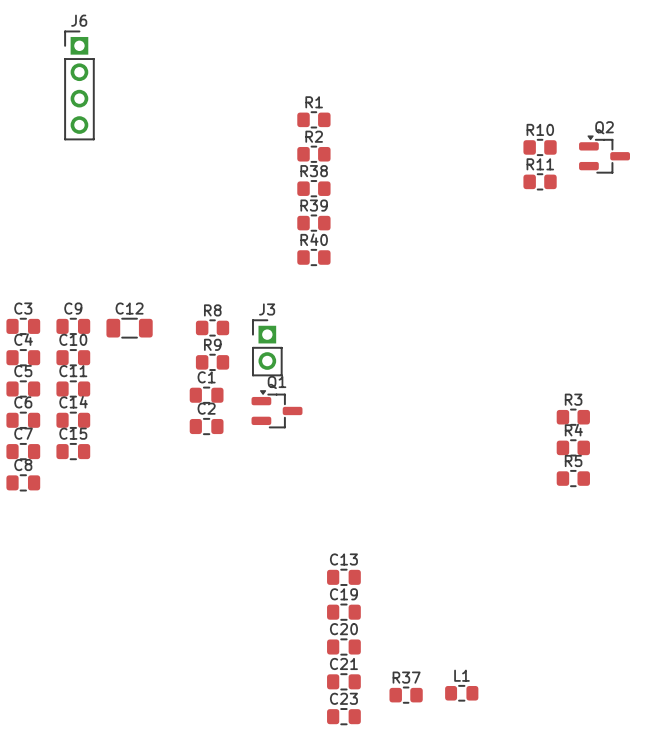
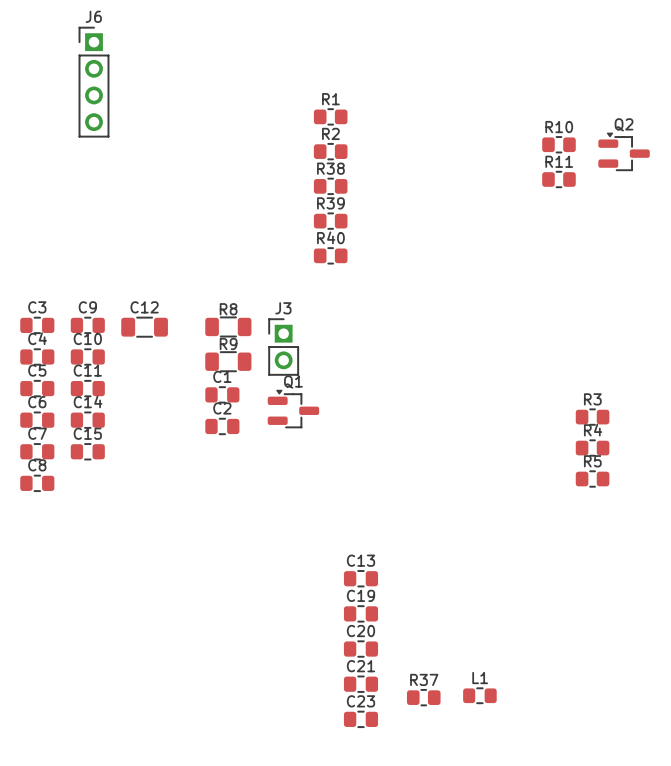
R8 footprint: [195, 319, 230, 337] -> [205, 316, 252, 338]
R9 footprint: [195, 354, 230, 371] -> [205, 351, 252, 372]

